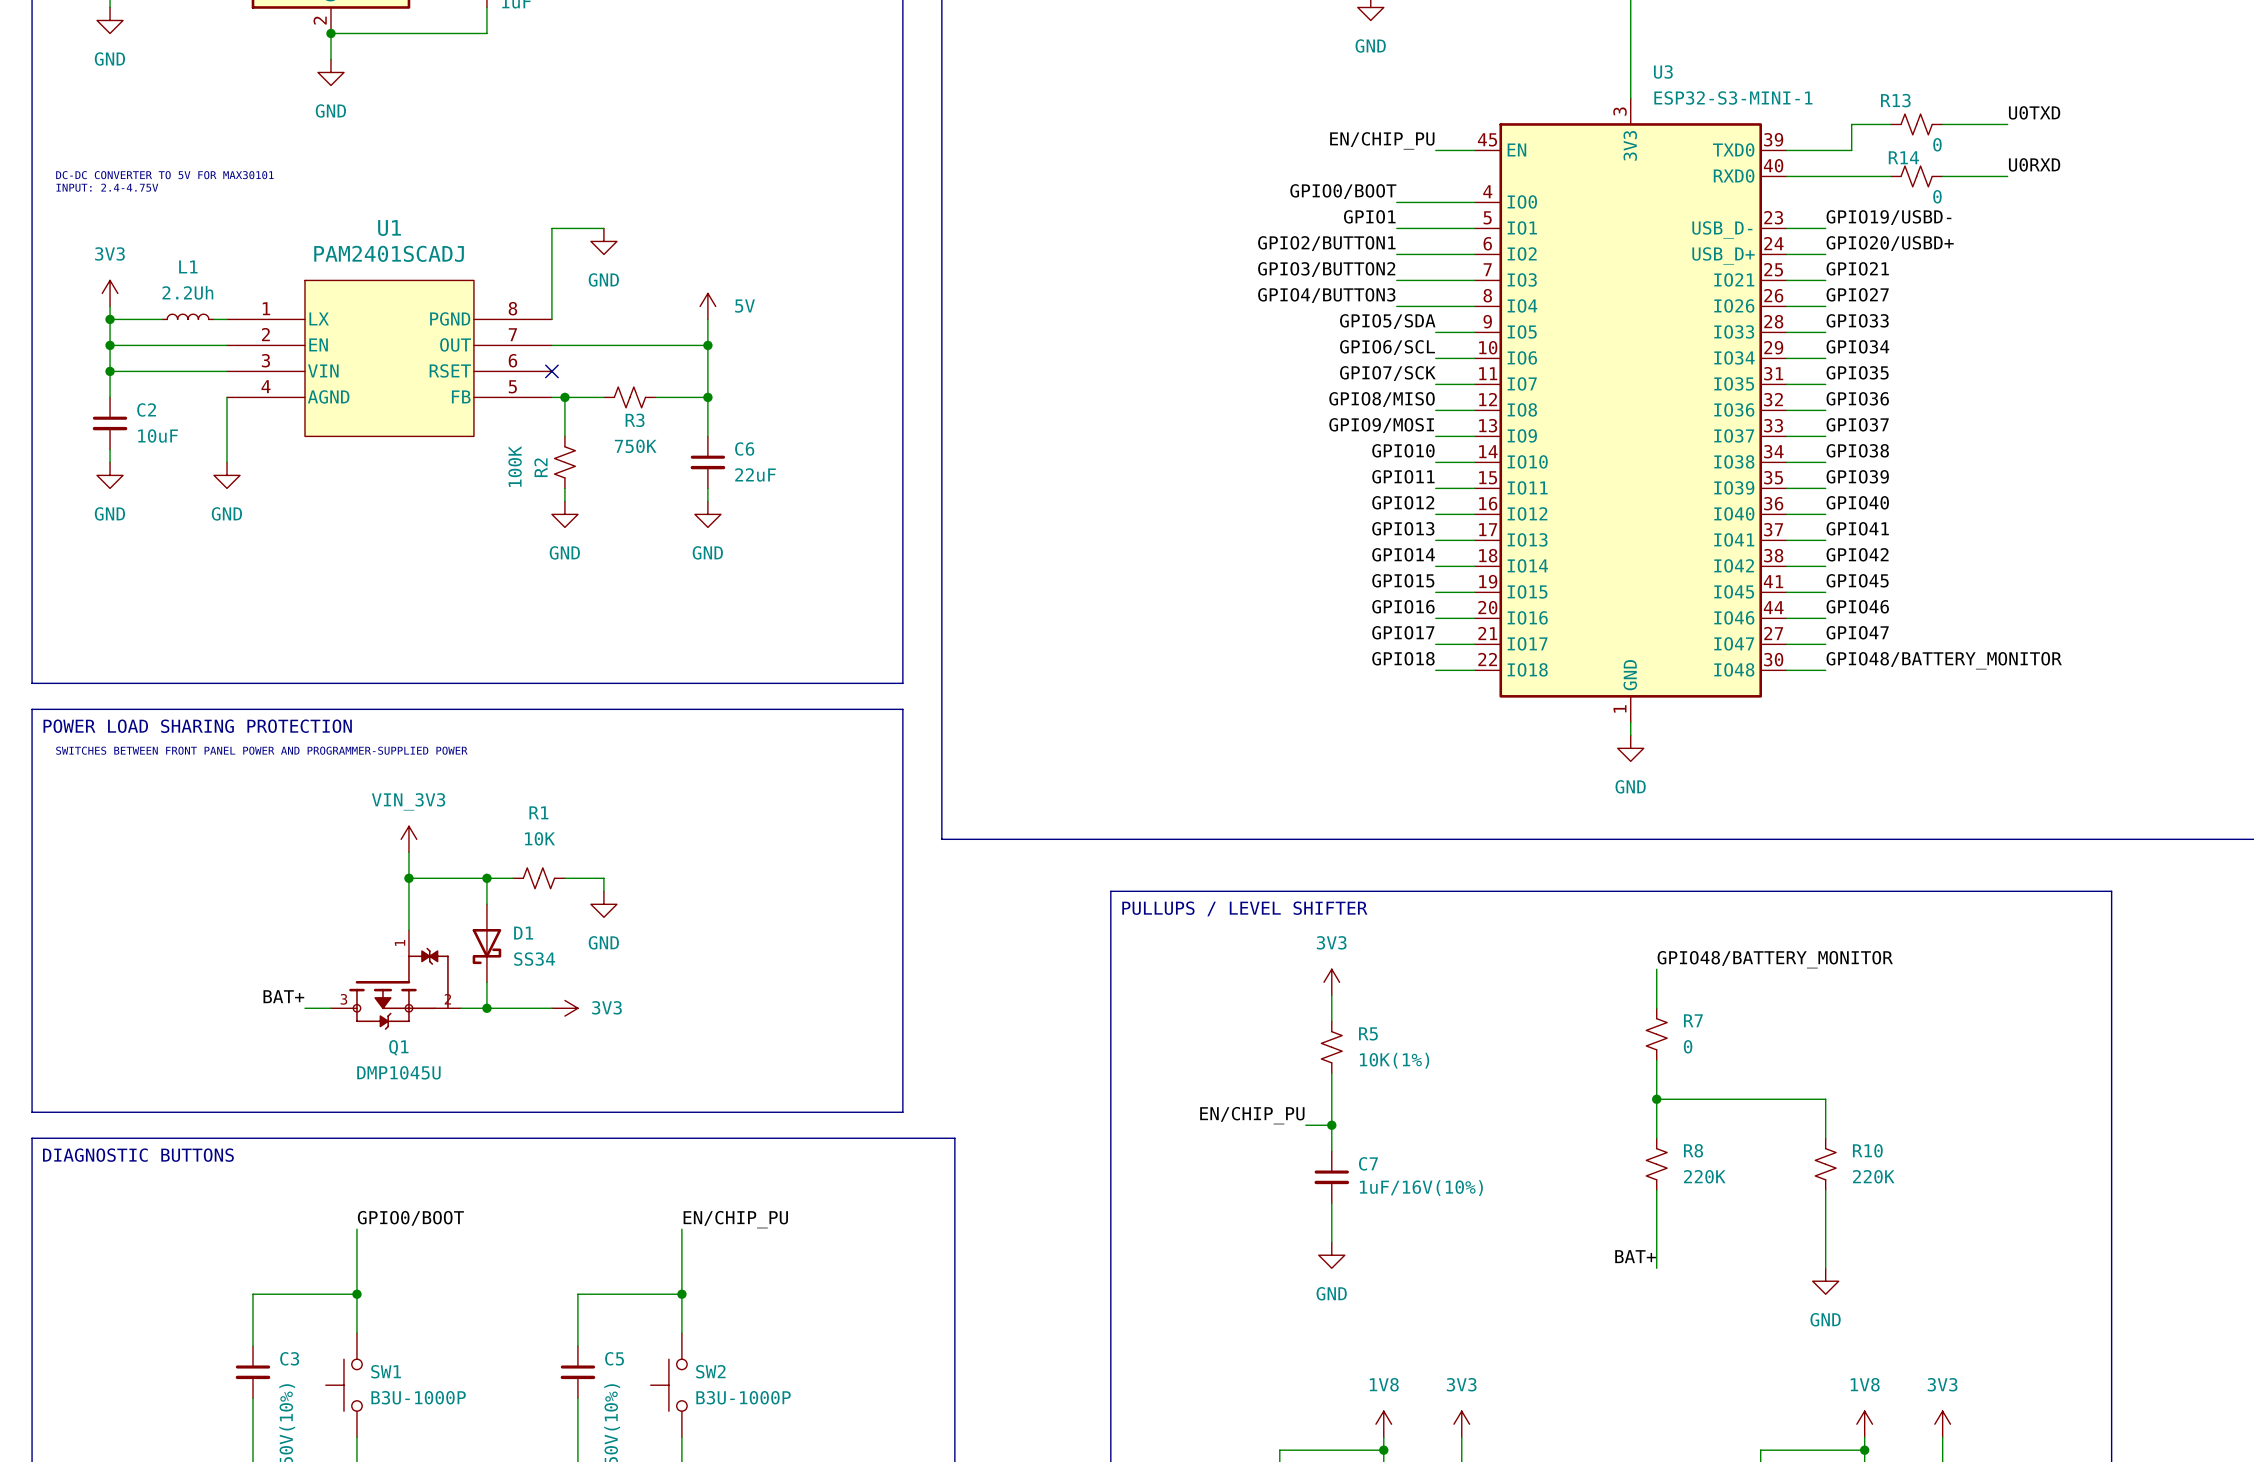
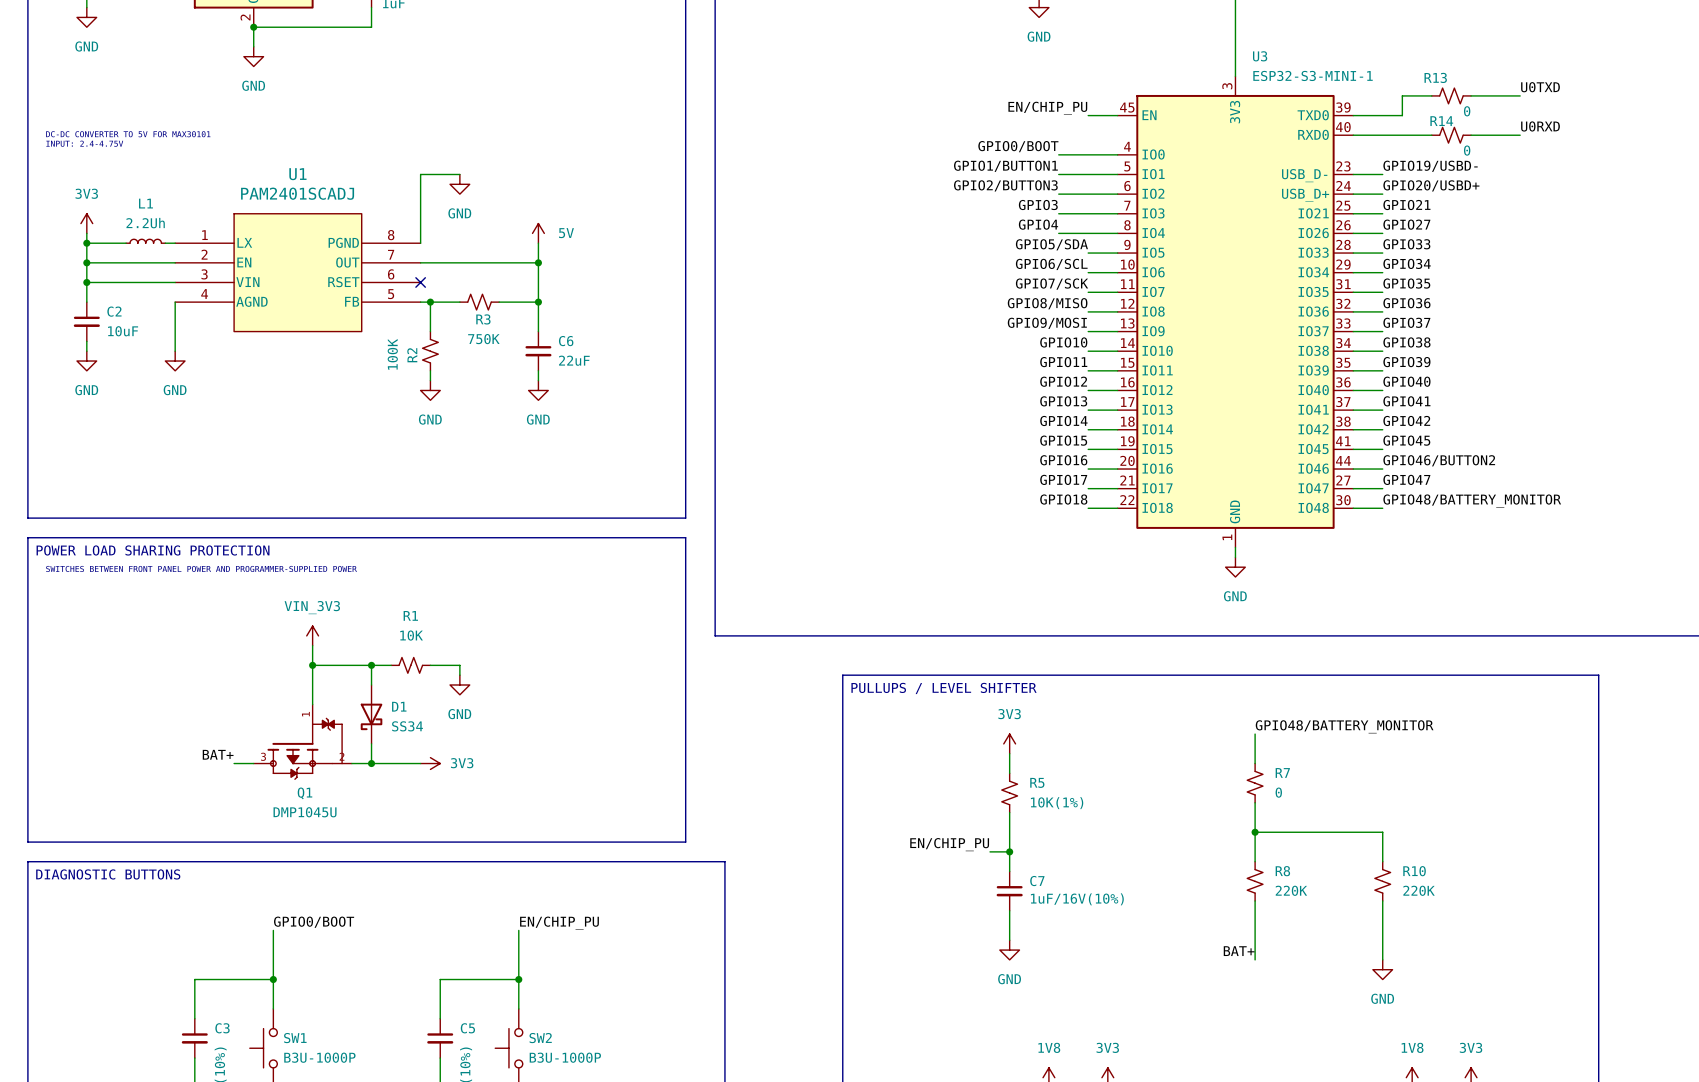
label: GPIO1 (1369, 216) -> GPIO1/BUTTON1 (1005, 166)
label: GPIO2/BUTTON1 (1326, 243) -> GPIO2/BUTTON3 (1005, 185)
label: GPIO3/BUTTON2 (1326, 269) -> GPIO3 (1038, 205)
label: GPIO4/BUTTON3 (1326, 295) -> GPIO4 (1038, 224)
label: GPIO46 (1857, 606) -> GPIO46/BUTTON2 (1439, 460)

